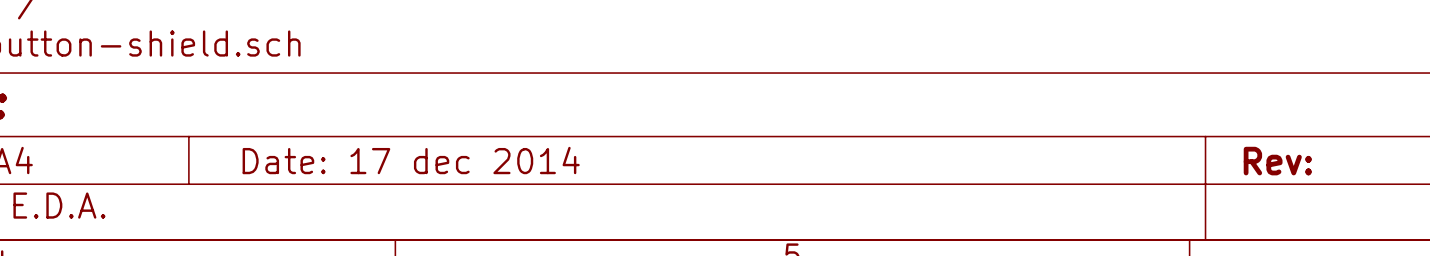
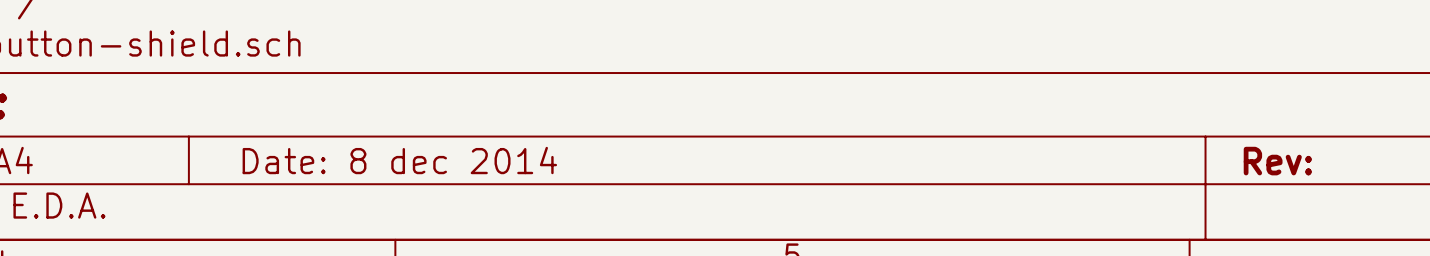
title block: Date: 17 dec 2014 (411, 160) -> Date: 8 dec 2014 (399, 160)

